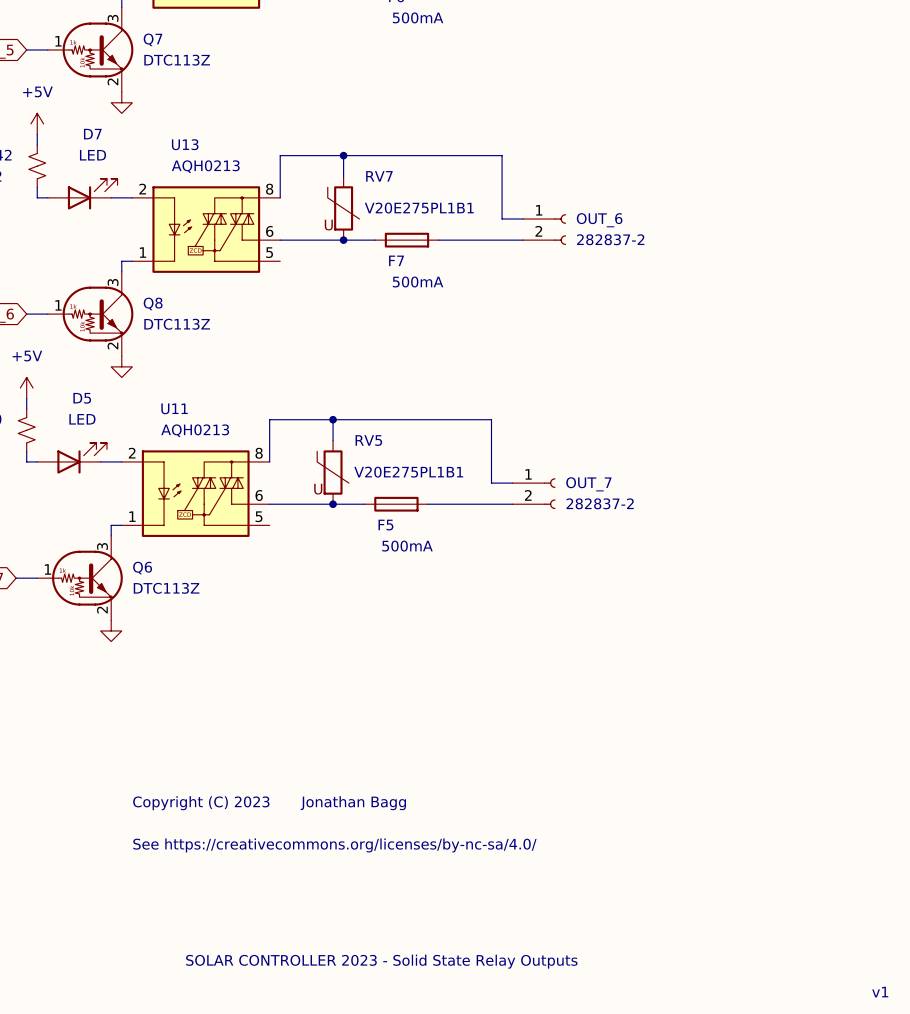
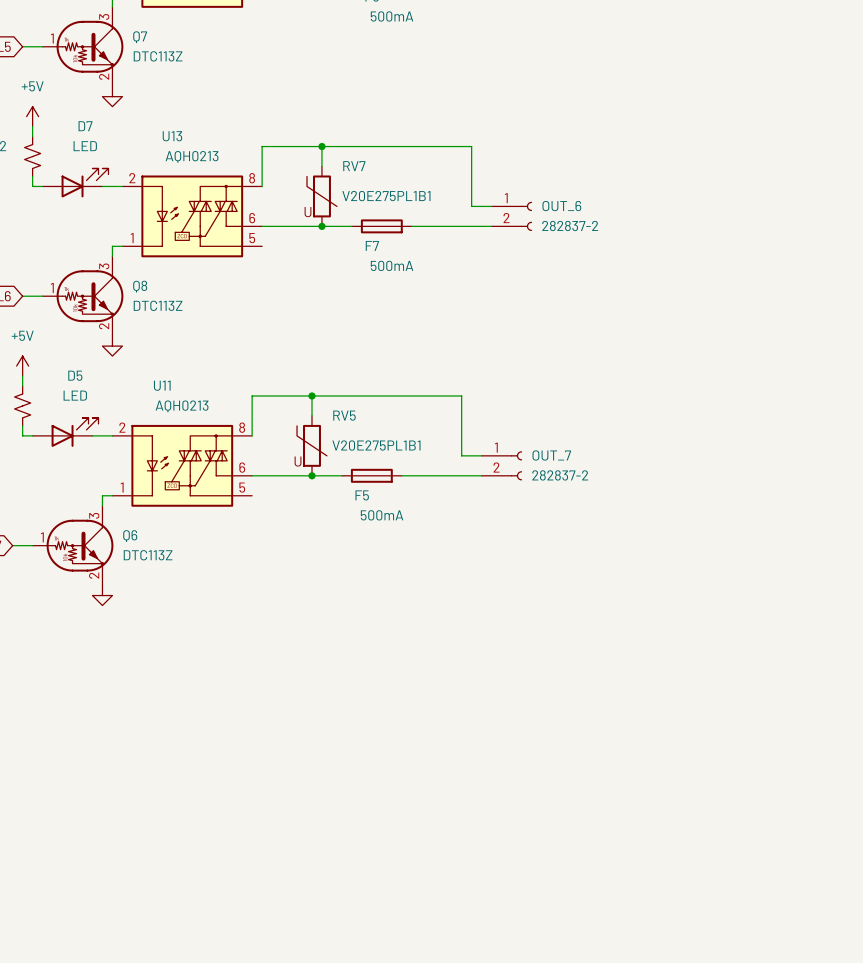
text: Copyright (C) 2023 (201, 803) -> none
text: Jonathan Bagg (353, 803) -> none
text: See https://creativecommons.org/licenses/by-nc-sa/4.0/ (334, 845) -> none
text: SOLAR CONTROLLER 2023 - Solid State Relay Outputs (381, 961) -> none
text: v1 (880, 992) -> none

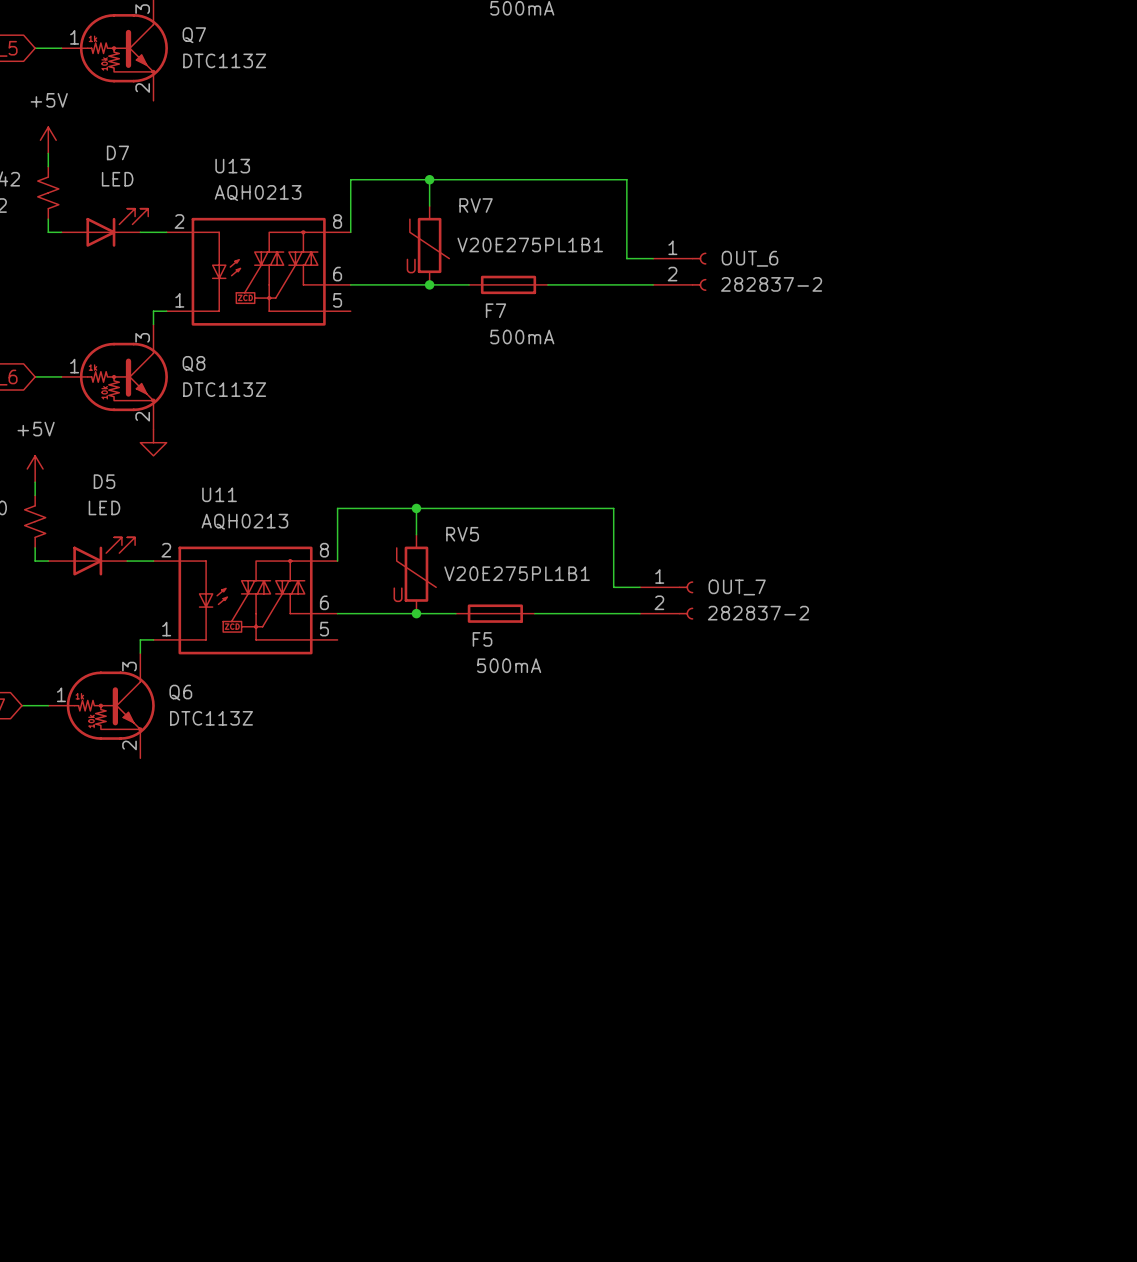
power symbol: (112, 96) -> none
power symbol: (102, 595) -> none

